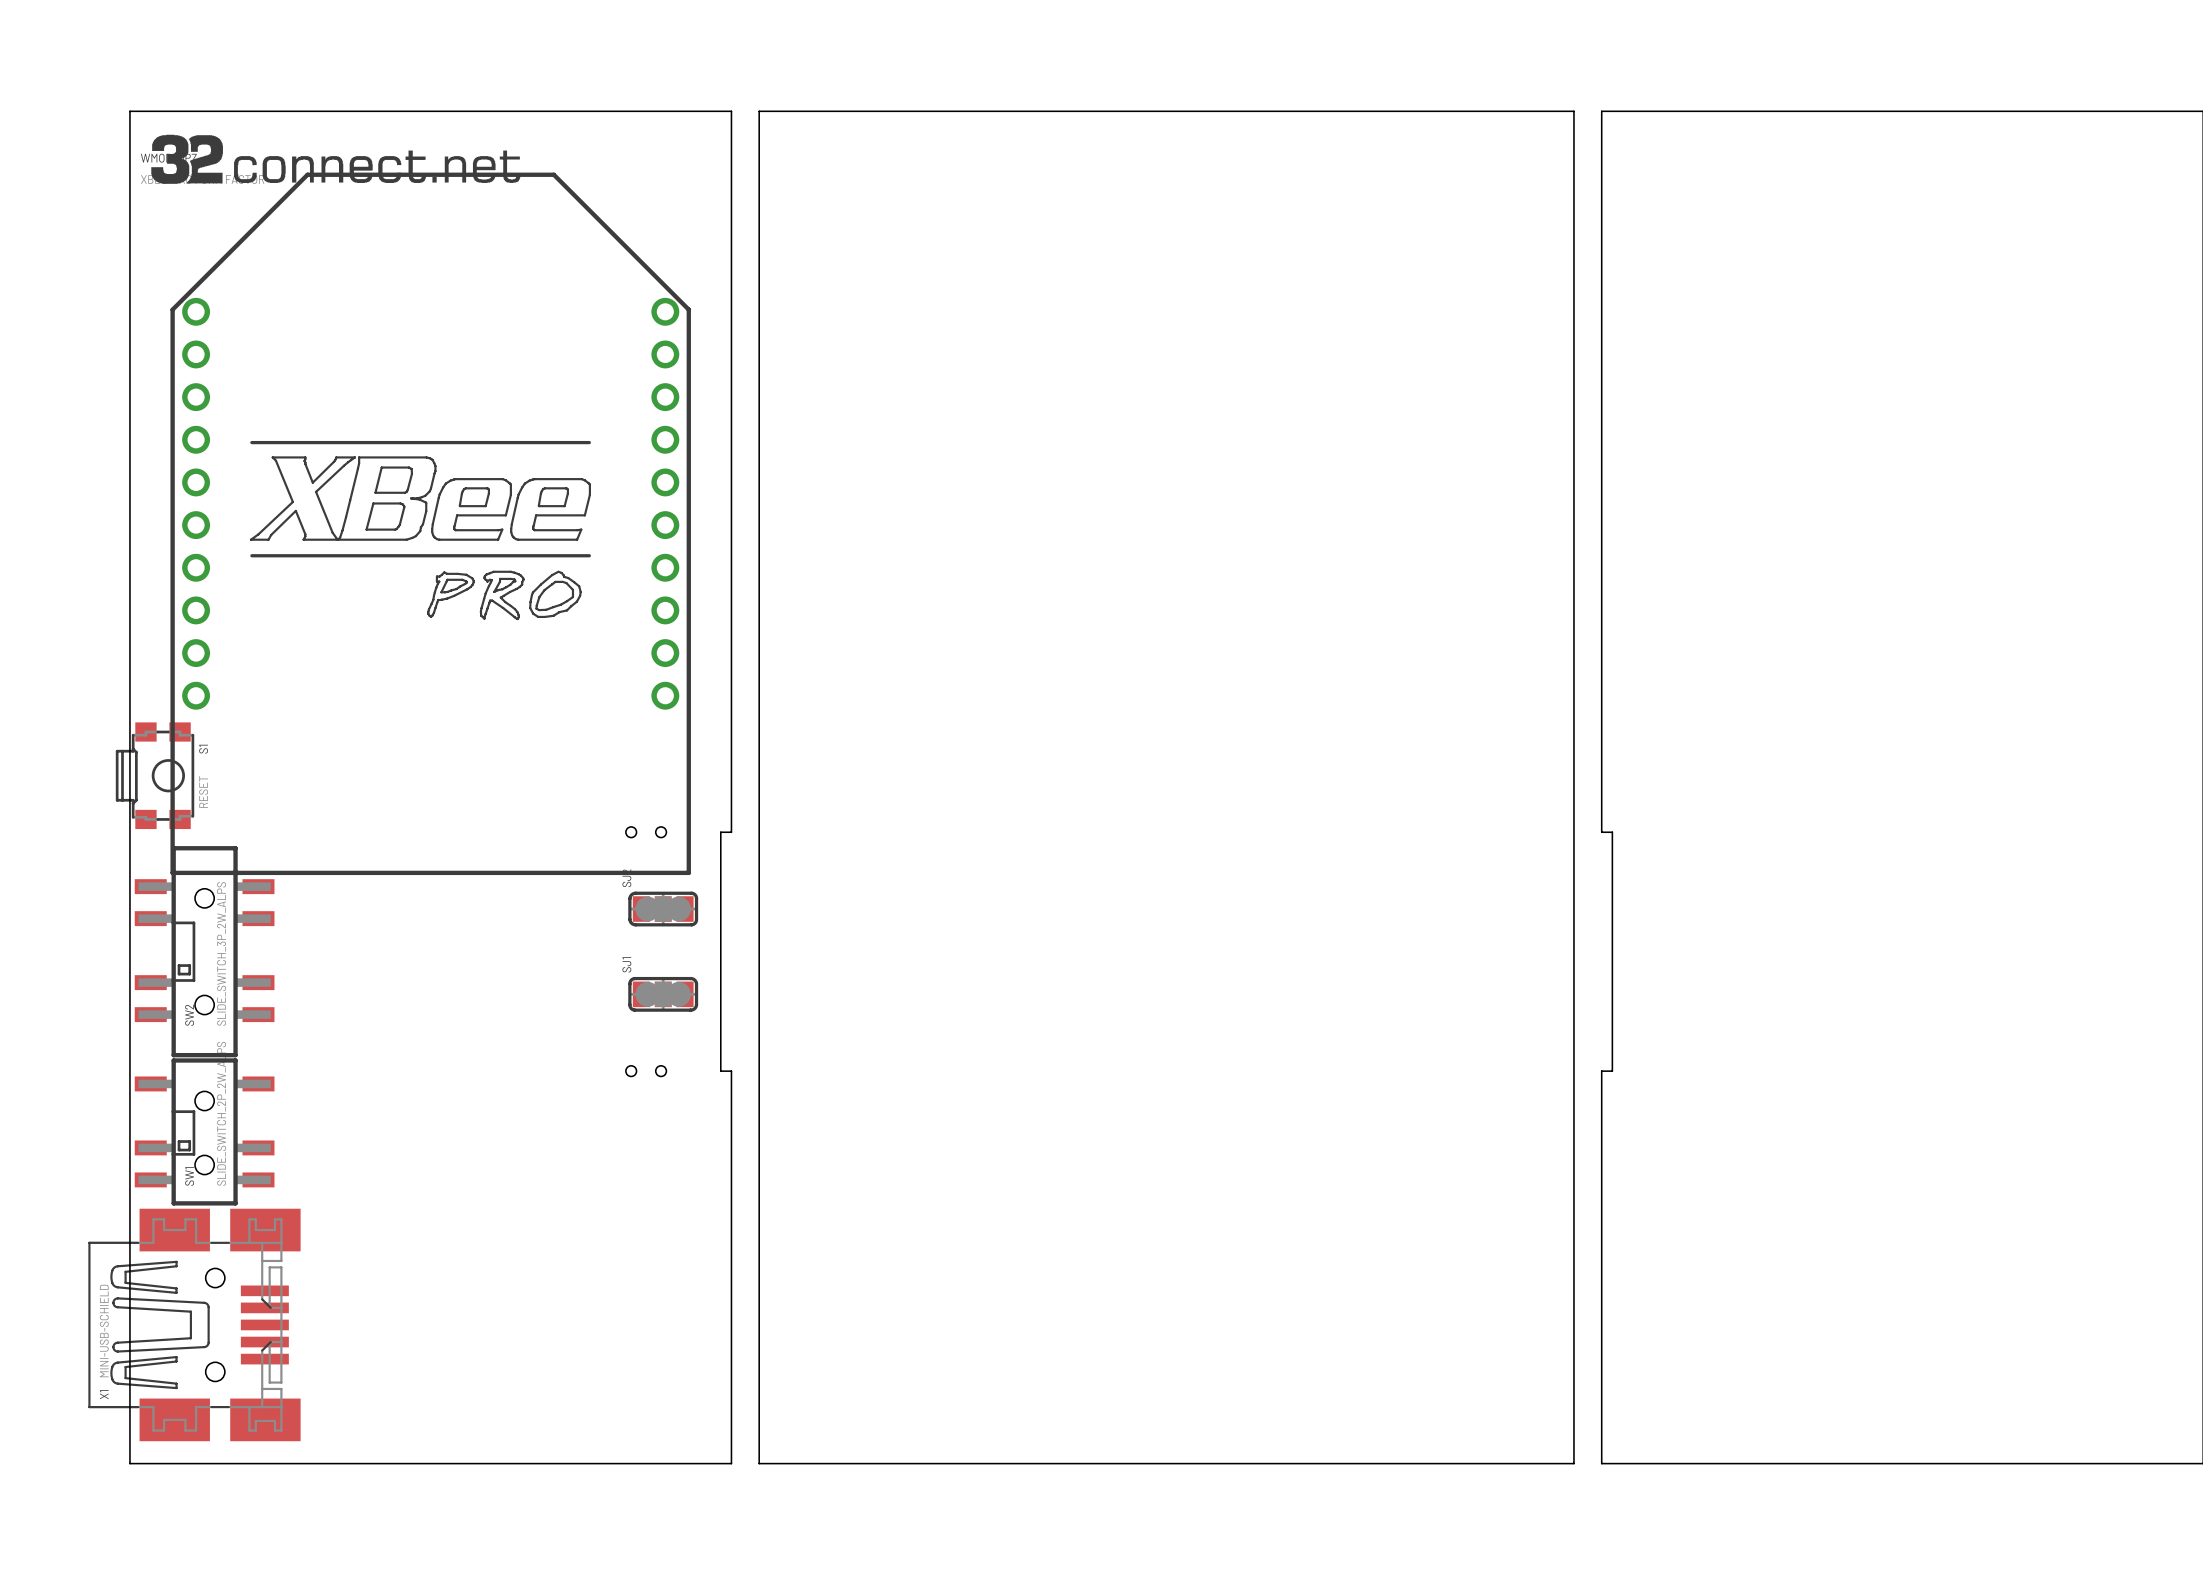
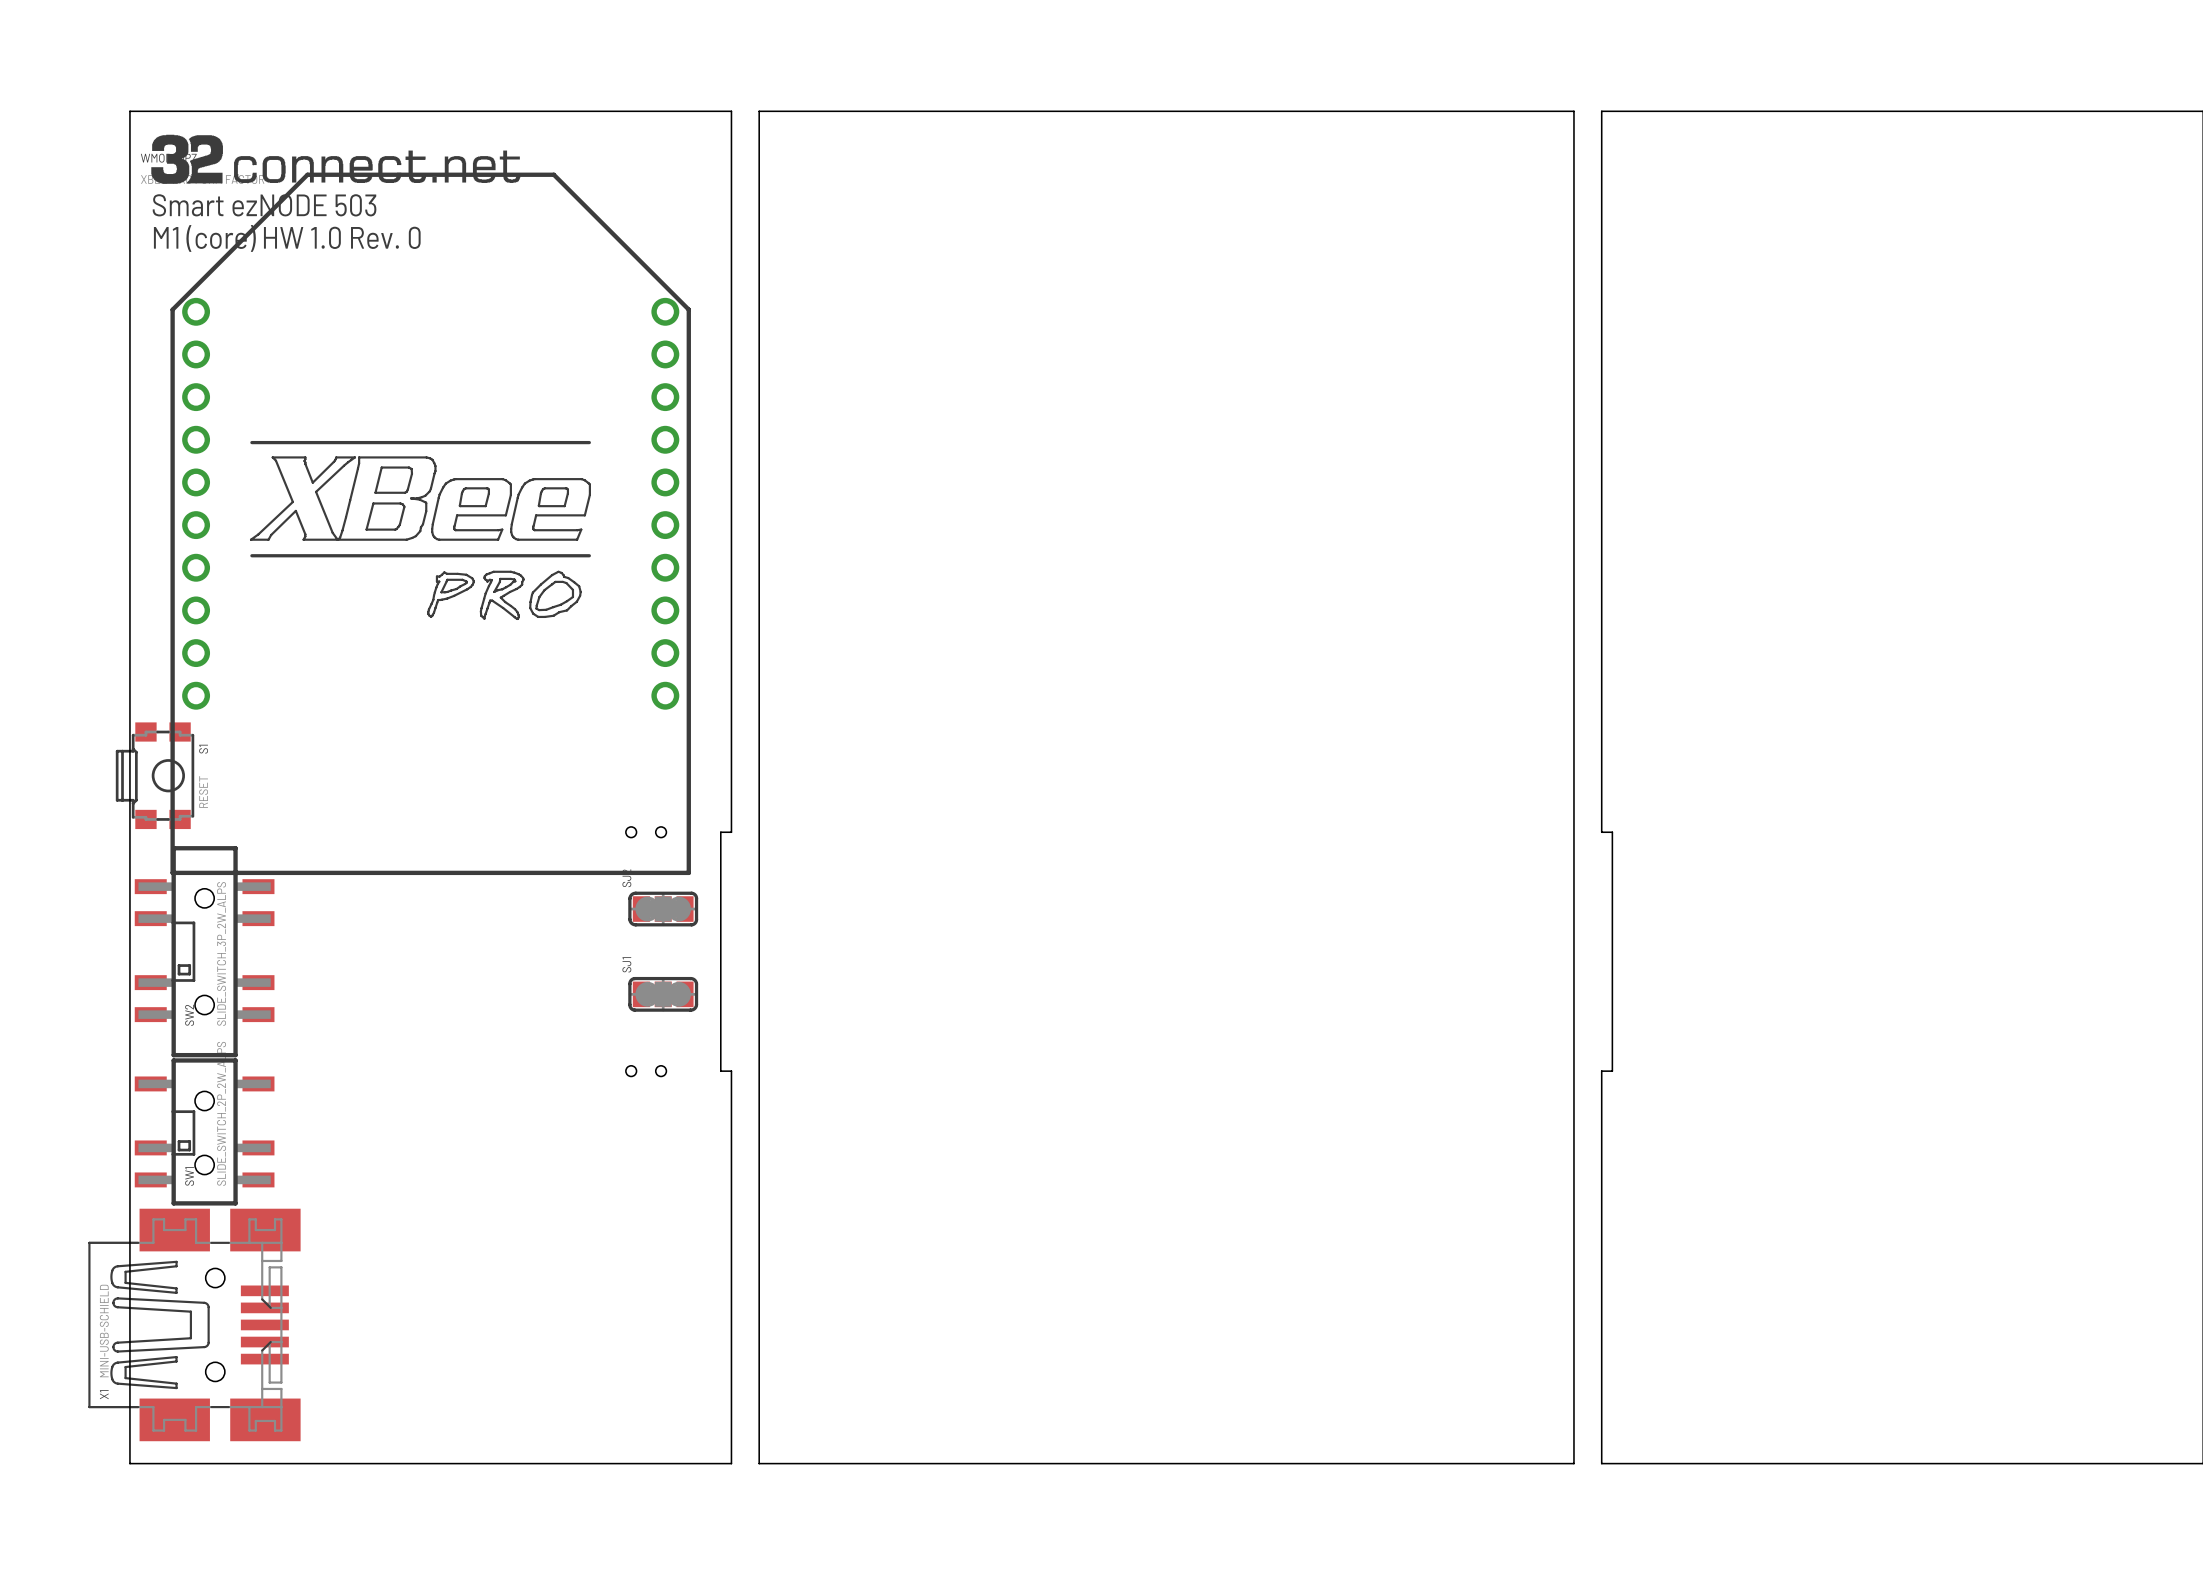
text: none -> Smart ezNODE 503 (264, 205)
text: none -> M1 (core) HW 1.0 Rev. 0 (287, 238)

